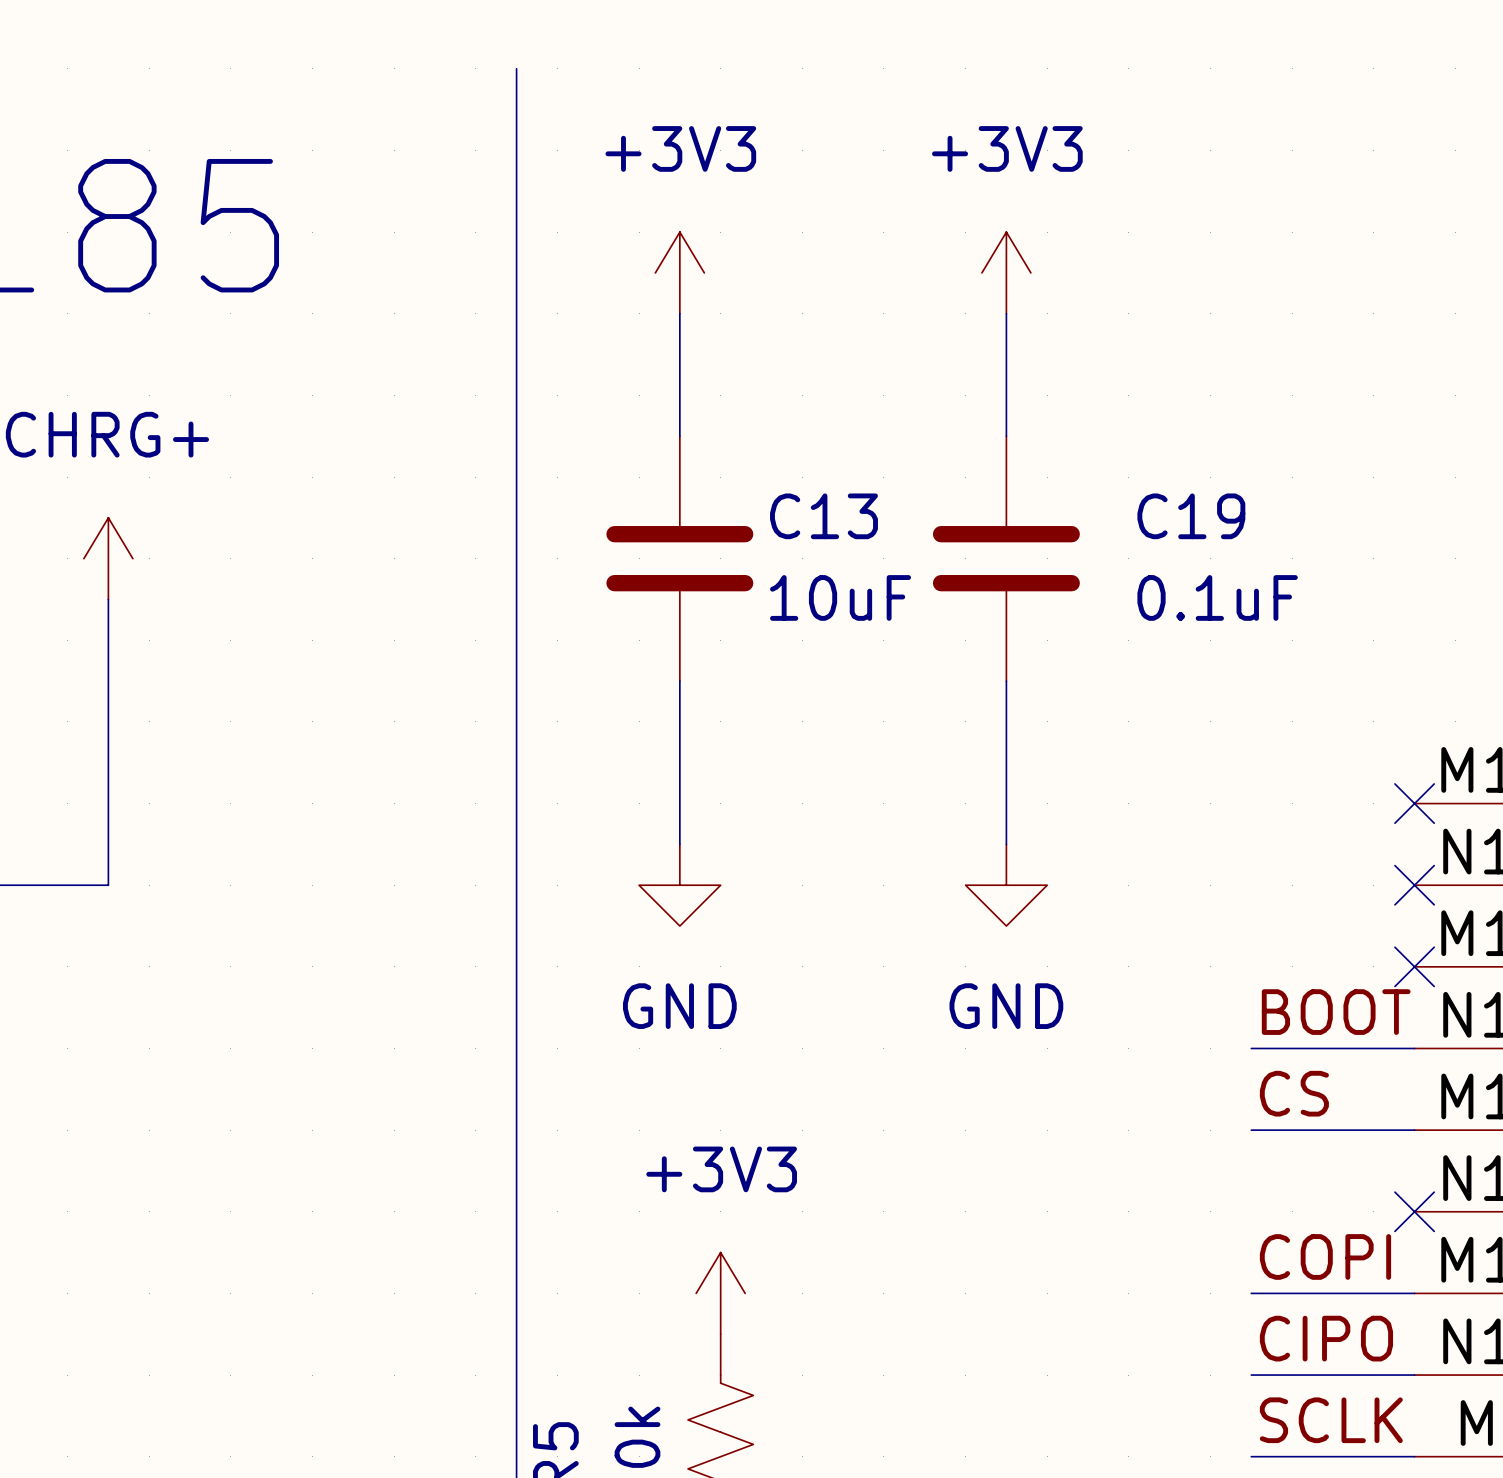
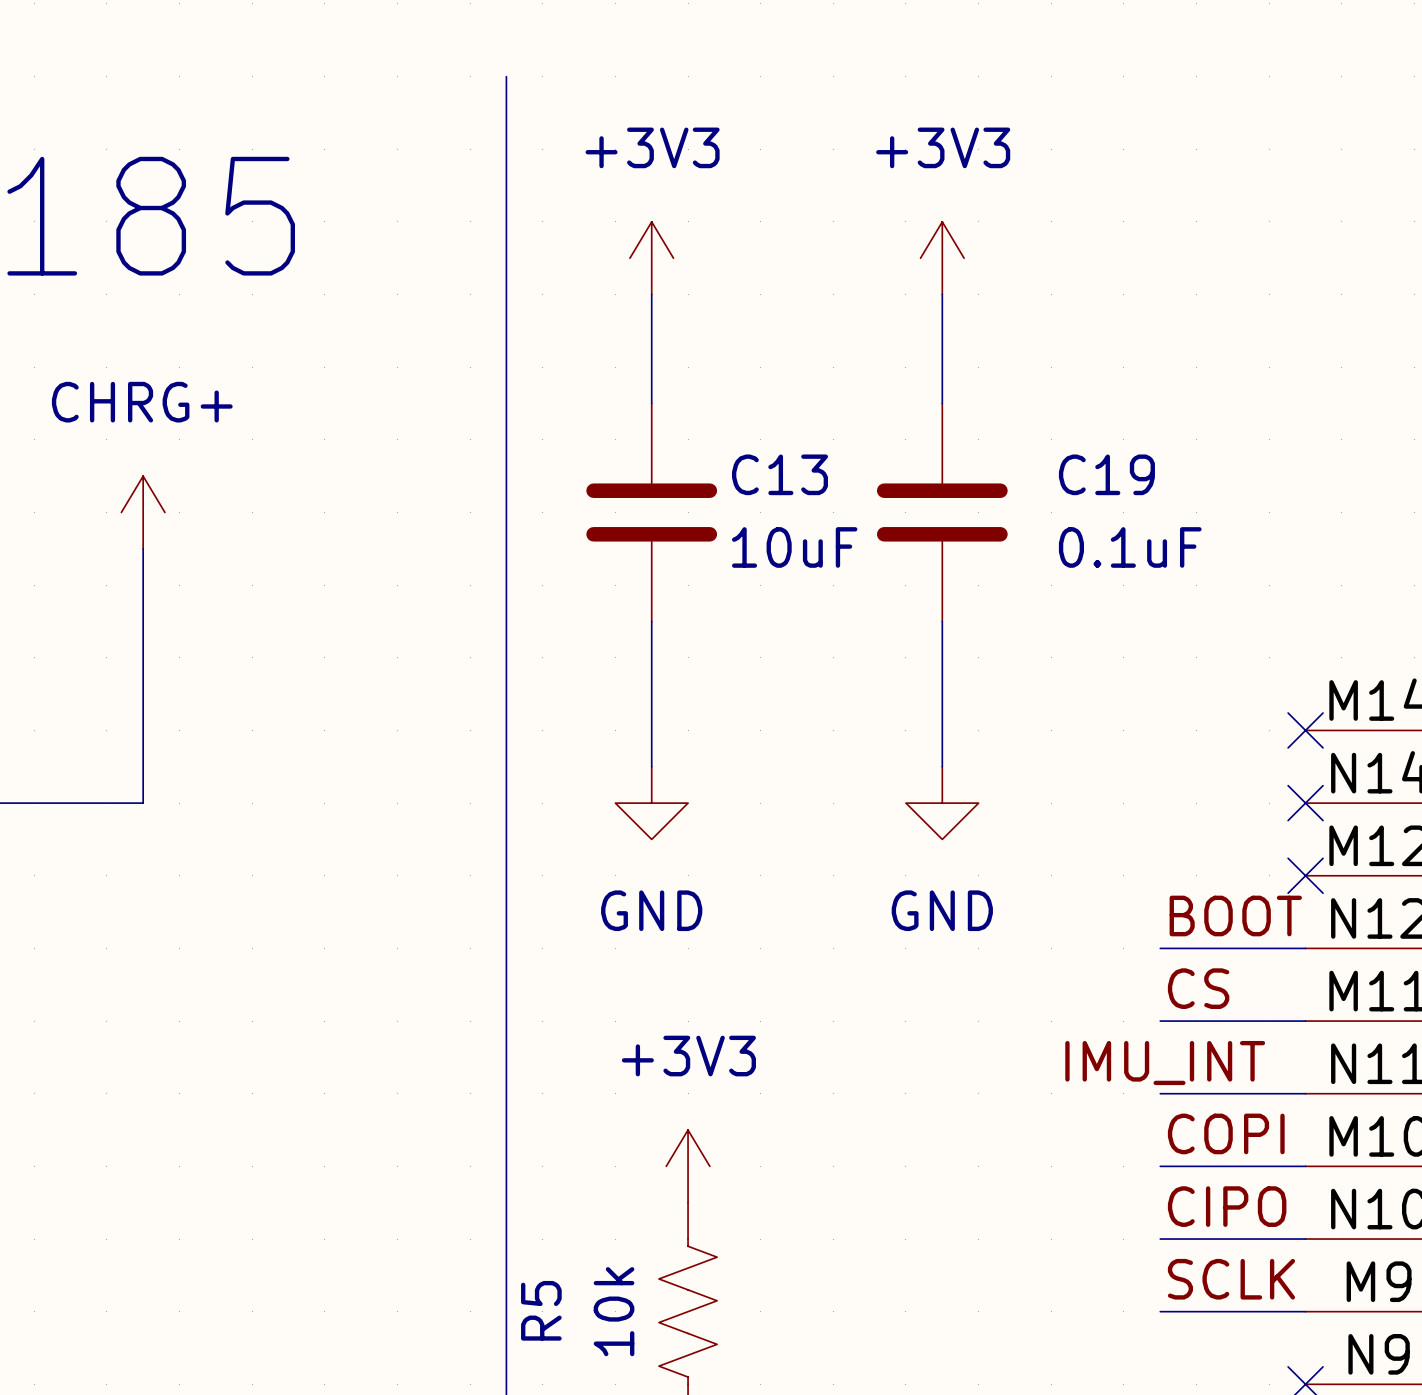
label: none -> IMU_INT (1165, 1063)
wire: none -> (1160, 1093) (1305, 1093)
no-connect mark: (1414, 1211) -> none

